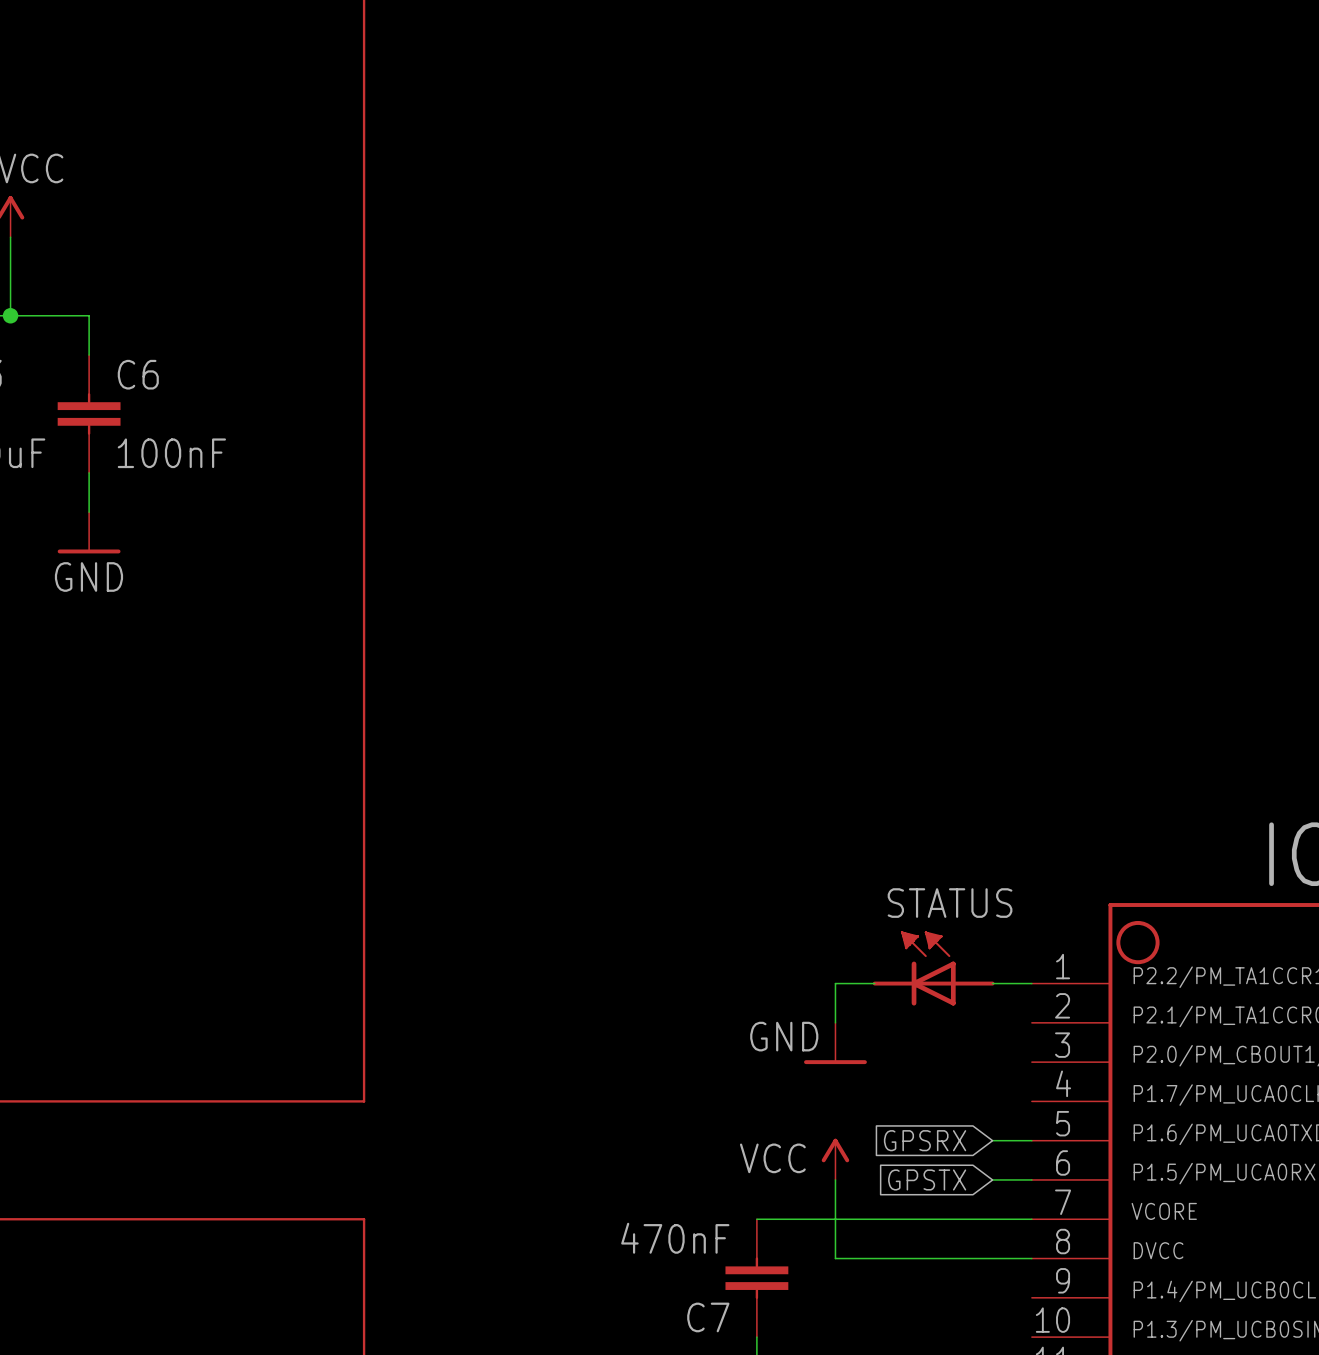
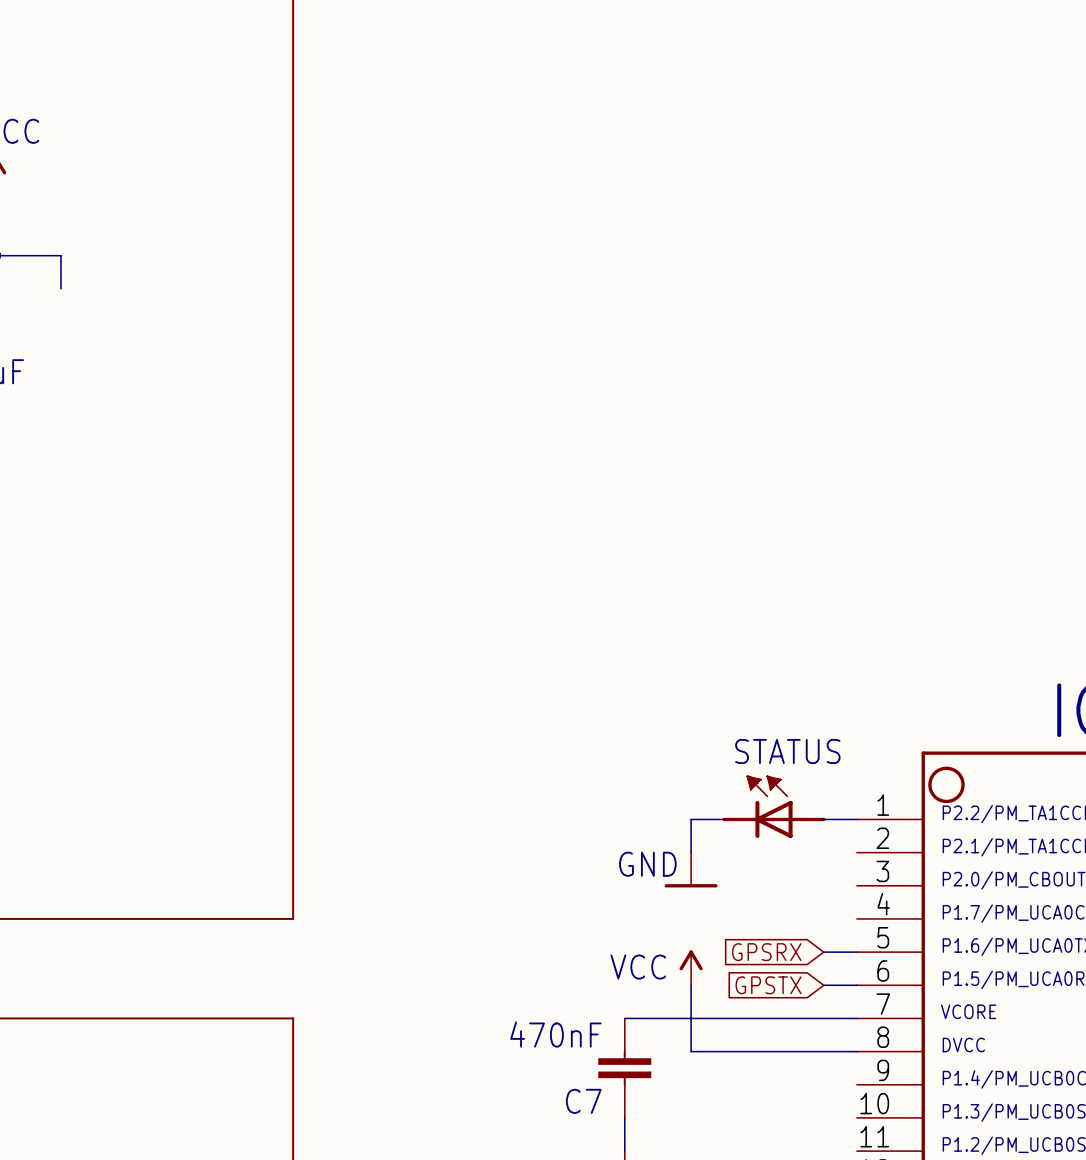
C6: 100nF (89, 413) -> none
wire: (89, 472) (89, 512) -> none
power symbol: GND (89, 532) -> none

